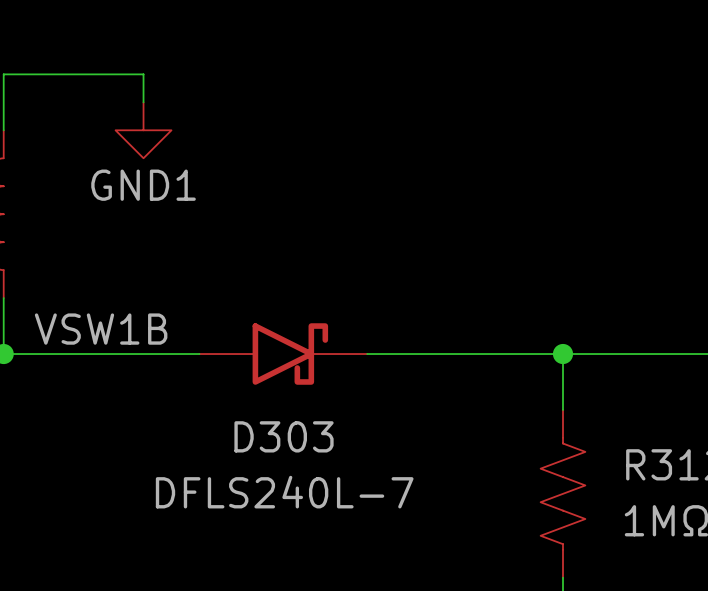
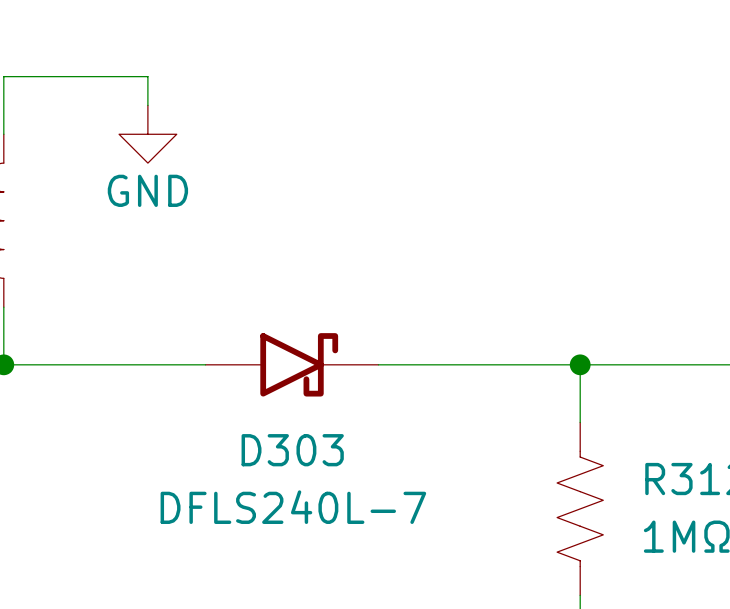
power symbol: GND1 (143, 130) -> GND (147, 134)
label: VSW1B (101, 329) -> none

